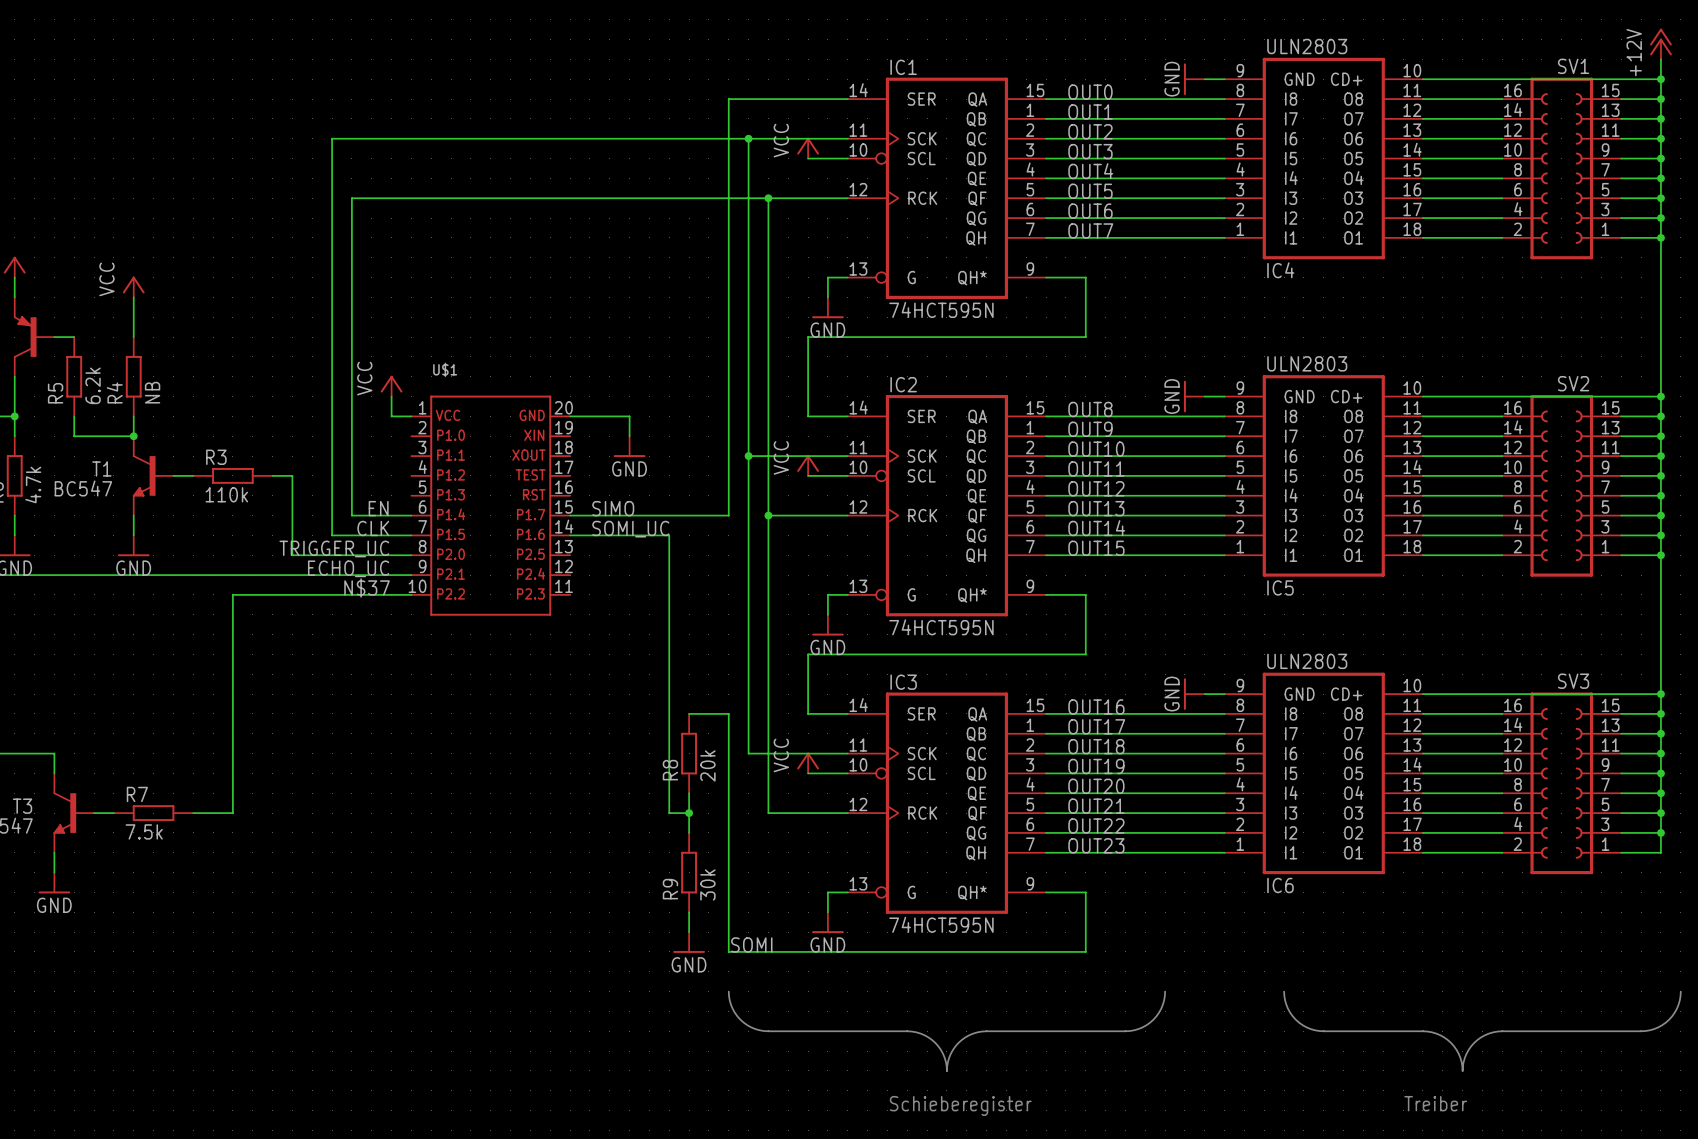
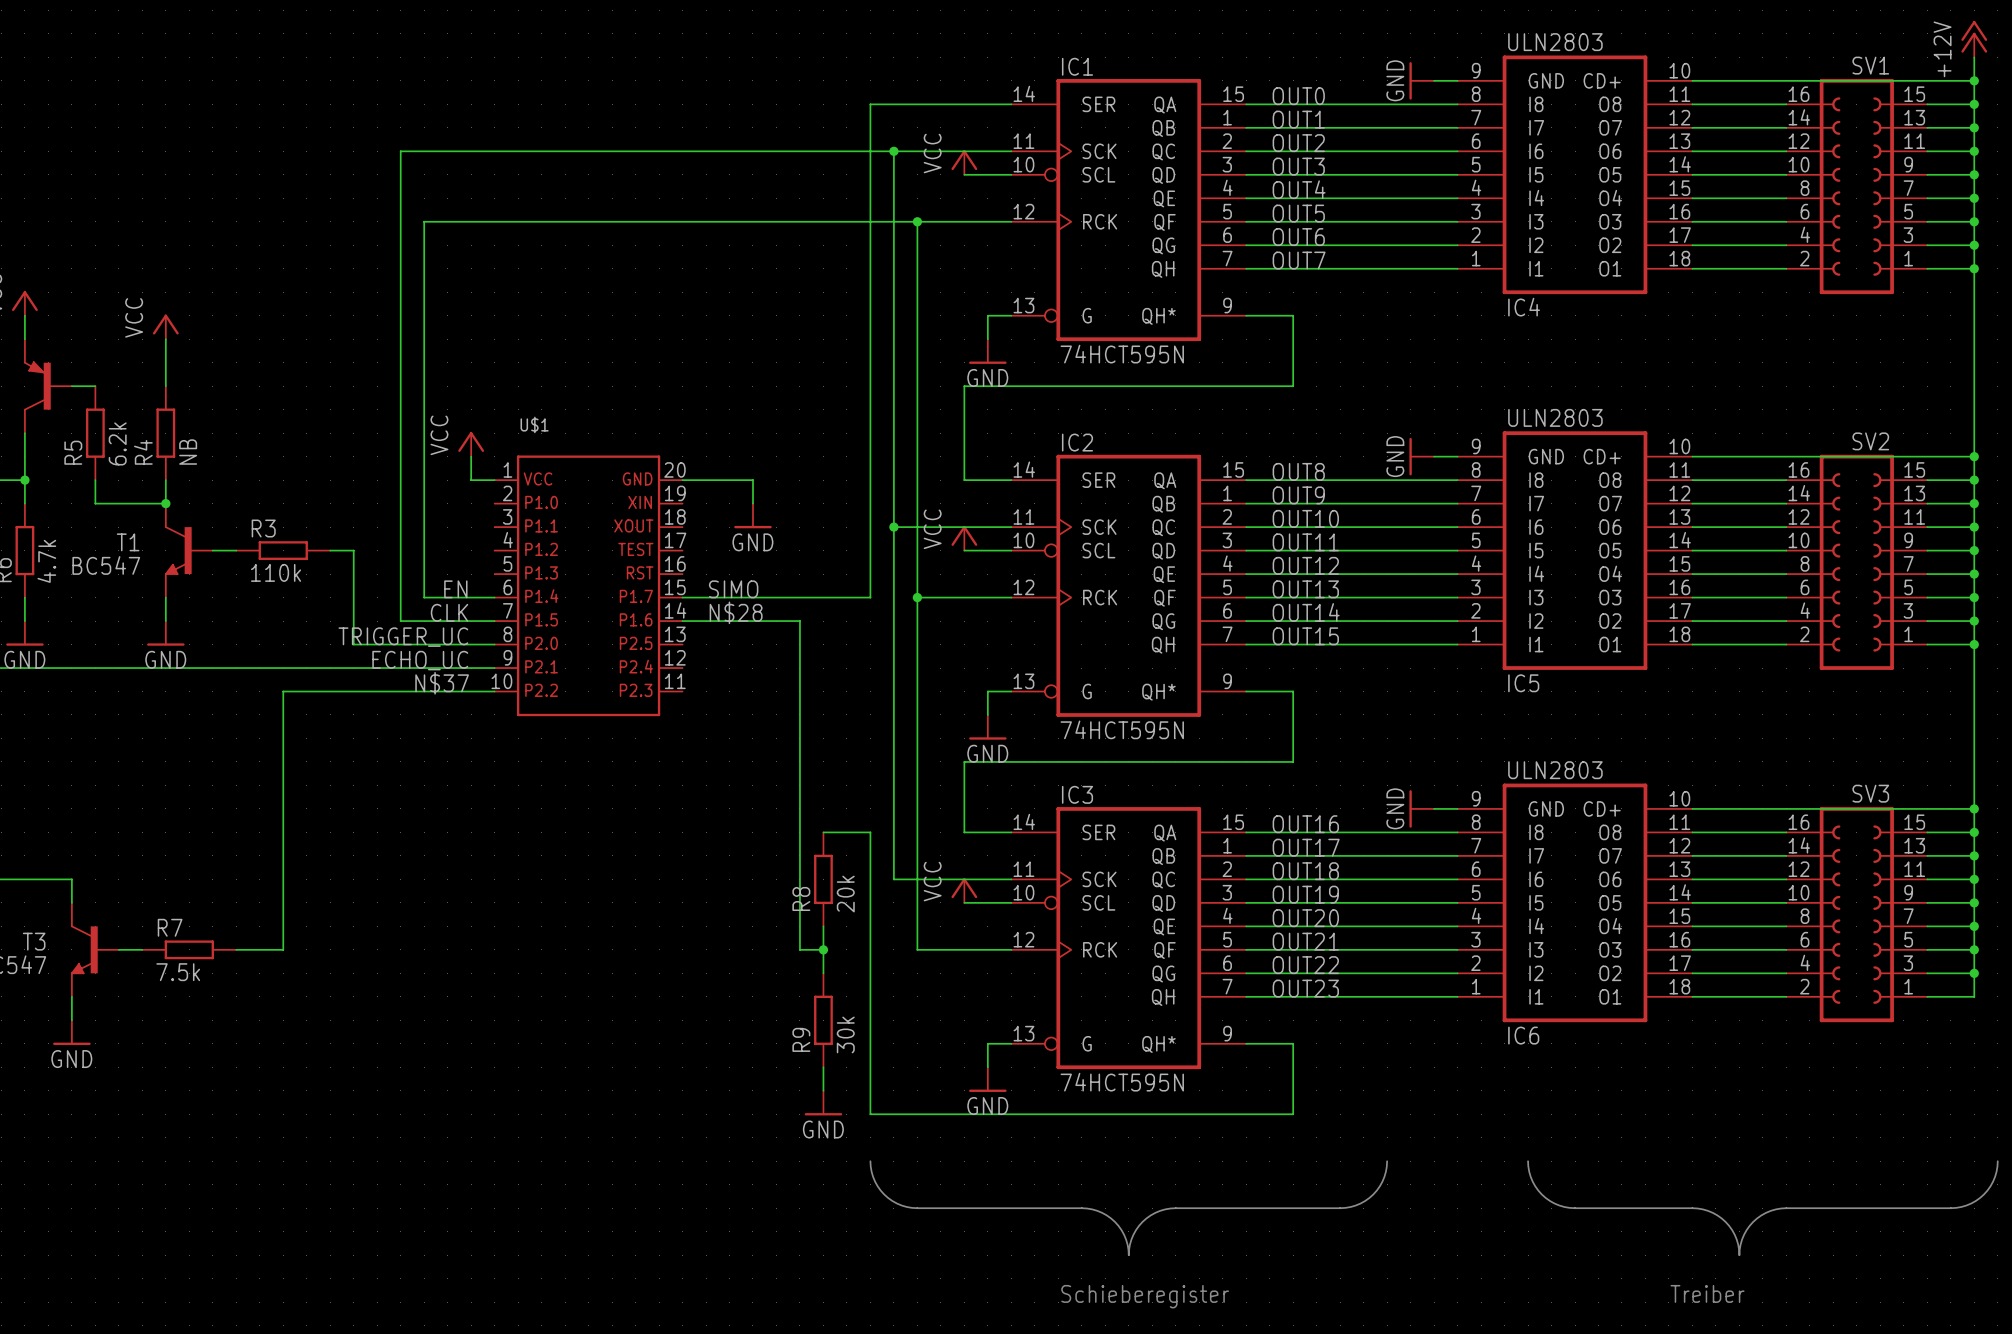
label: SOMI_UC (630, 529) -> N$28 (736, 612)
label: SOMI (751, 944) -> none

